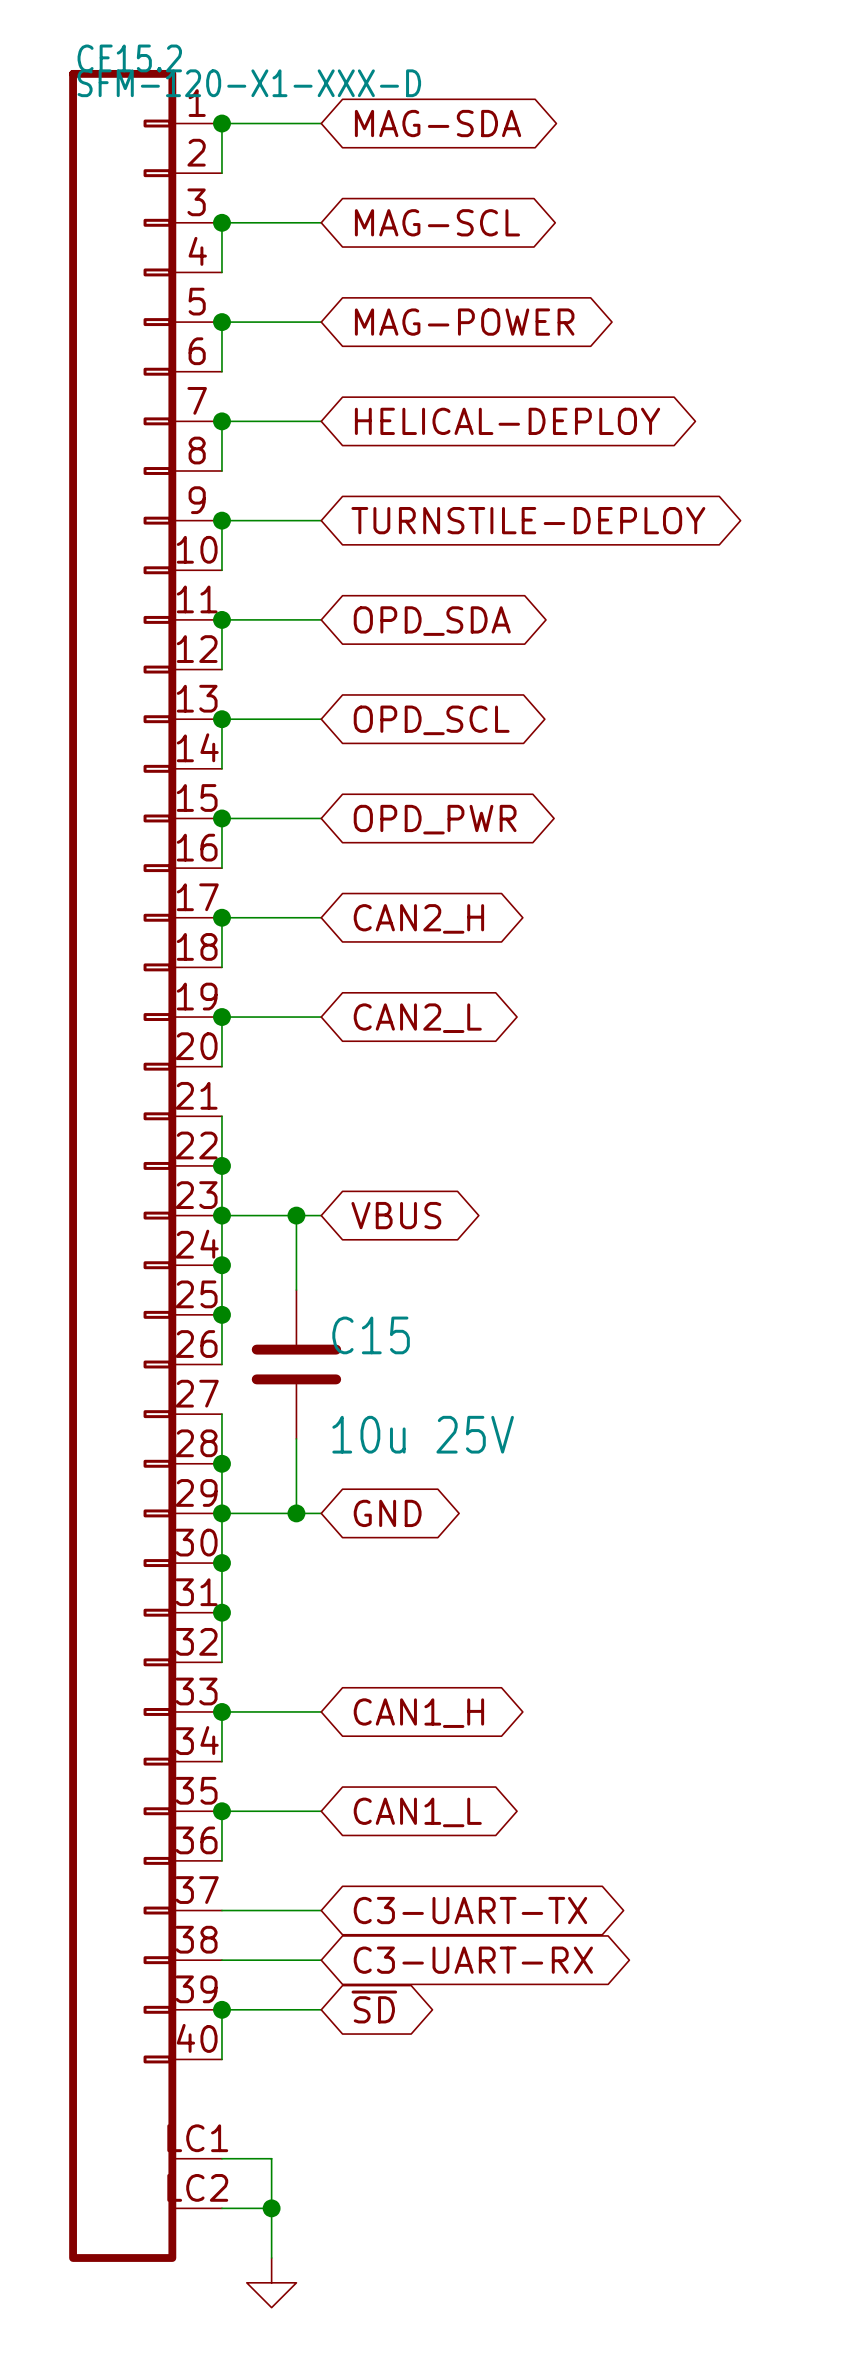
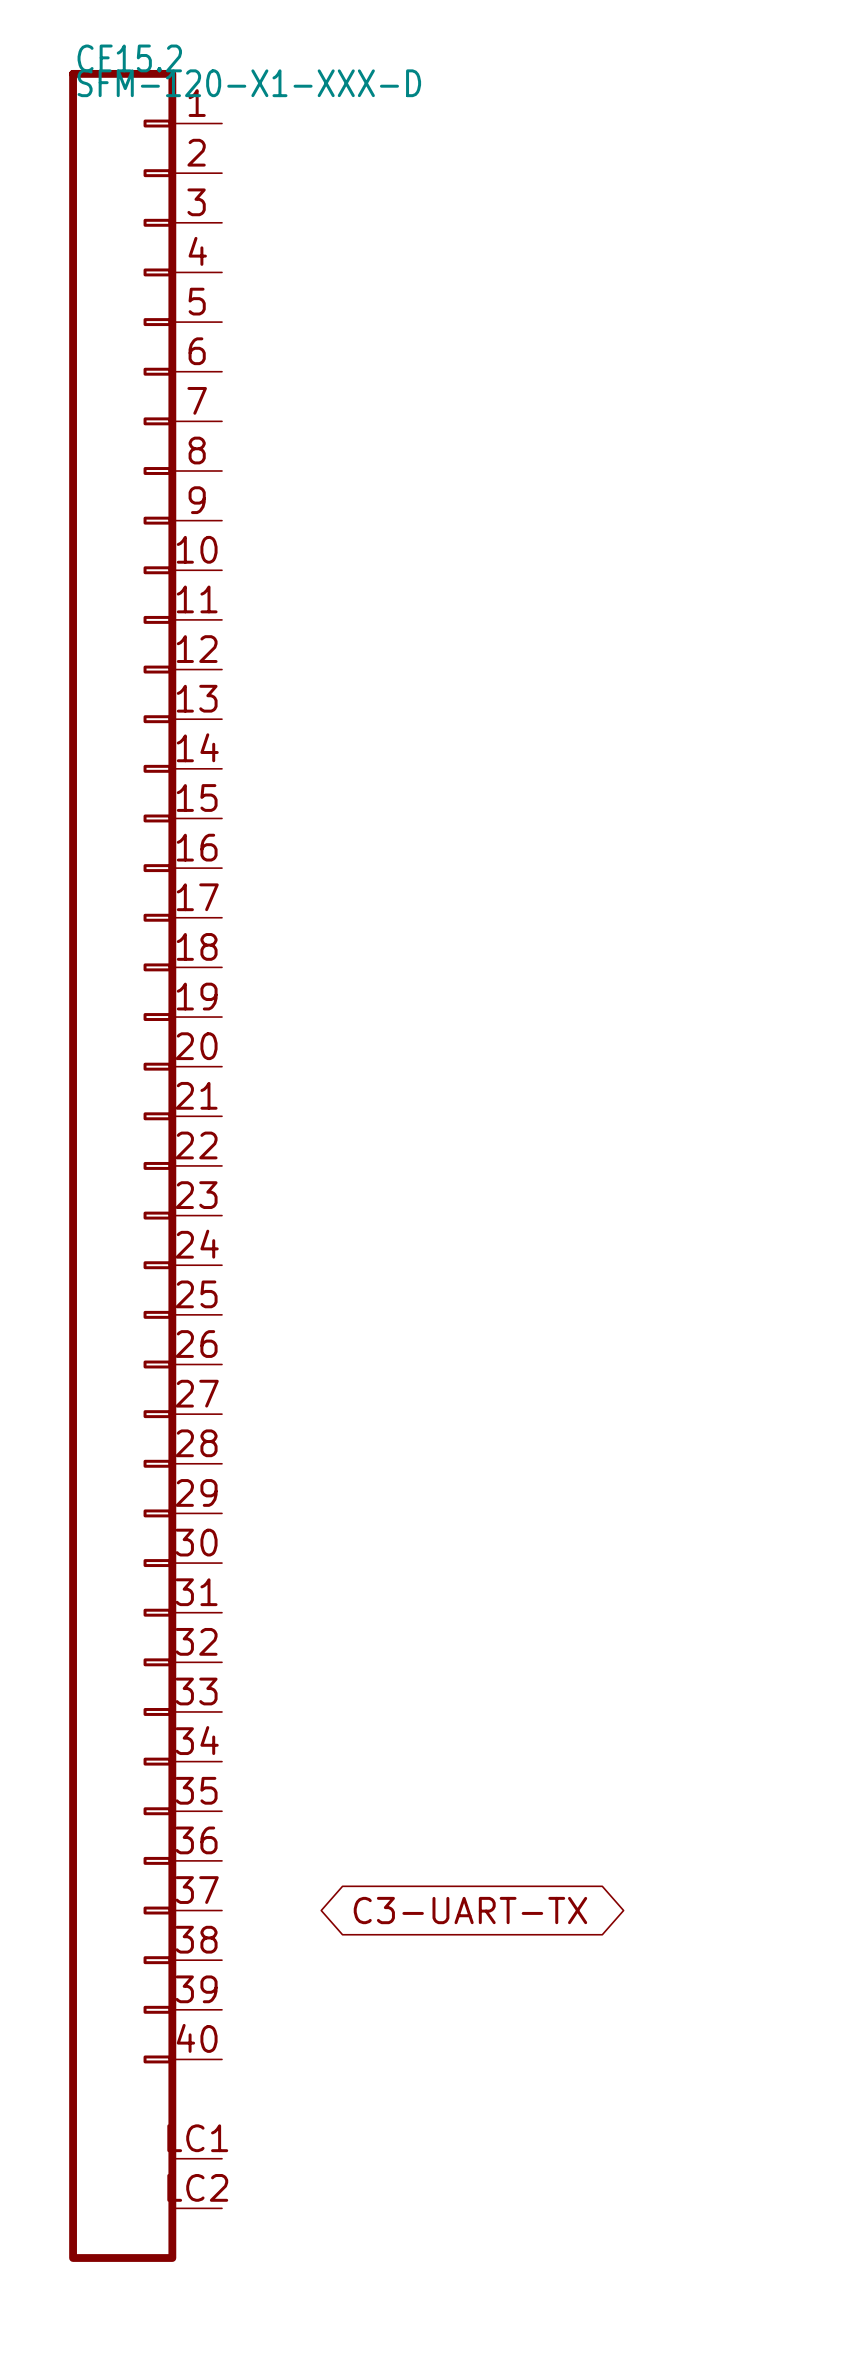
junction: (221, 123) -> none
wire: (321, 123) (221, 123) (221, 173) -> none
global label: MAG-SDA (438, 123) -> none
junction: (221, 222) -> none
wire: (321, 222) (221, 222) (221, 272) -> none
global label: MAG-SCL (437, 222) -> none
junction: (221, 322) -> none
wire: (321, 322) (221, 322) (221, 371) -> none
global label: MAG-POWER (464, 322) -> none
junction: (221, 421) -> none
wire: (321, 421) (221, 421) (221, 470) -> none
global label: HELICAL-DEPLOY (507, 421) -> none
junction: (221, 520) -> none
wire: (321, 520) (221, 520) (221, 570) -> none
global label: TURNSTILE-DEPLOY (528, 520) -> none
junction: (221, 619) -> none
wire: (321, 619) (221, 619) (221, 669) -> none
global label: OPD_SDA (432, 621) -> none
junction: (221, 719) -> none
wire: (321, 719) (221, 719) (221, 768) -> none
global label: OPD_SCL (431, 720) -> none
junction: (221, 818) -> none
wire: (321, 818) (221, 818) (221, 868) -> none
global label: OPD_PWR (435, 819) -> none
junction: (221, 917) -> none
wire: (321, 917) (221, 917) (221, 967) -> none
global label: CAN2_H (418, 918) -> none
junction: (221, 1017) -> none
wire: (321, 1017) (221, 1017) (221, 1066) -> none
global label: CAN2_L (417, 1018) -> none
wire: (221, 1116) (221, 1364) -> none
junction: (221, 1165) -> none
wire: (221, 1215) (321, 1215) -> none
junction: (221, 1215) -> none
wire: (296, 1215) (296, 1290) -> none
junction: (296, 1215) -> none
global label: VBUS (396, 1215) -> none
junction: (221, 1265) -> none
junction: (221, 1314) -> none
C15: 10u 25V (296, 1364) -> none
wire: (221, 1414) (221, 1662) -> none
wire: (296, 1438) (296, 1513) -> none
junction: (221, 1463) -> none
wire: (221, 1513) (321, 1513) -> none
junction: (221, 1513) -> none
junction: (296, 1513) -> none
global label: GND (387, 1513) -> none
junction: (221, 1563) -> none
junction: (221, 1612) -> none
junction: (221, 1711) -> none
wire: (321, 1711) (221, 1711) (221, 1761) -> none
global label: CAN1_H (418, 1713) -> none
junction: (221, 1811) -> none
wire: (321, 1811) (221, 1811) (221, 1860) -> none
global label: CAN1_L (417, 1812) -> none
wire: (221, 1910) (321, 1910) -> none
wire: (221, 1960) (321, 1960) -> none
global label: C3-UART-RX (473, 1960) -> none
global label: ~{SD} (374, 2007) -> none
junction: (221, 2009) -> none
wire: (321, 2009) (221, 2009) (221, 2059) -> none
wire: (221, 2158) (271, 2158) (271, 2258) -> none
wire: (221, 2208) (271, 2208) -> none
junction: (271, 2208) -> none
power symbol: (271, 2282) -> none

